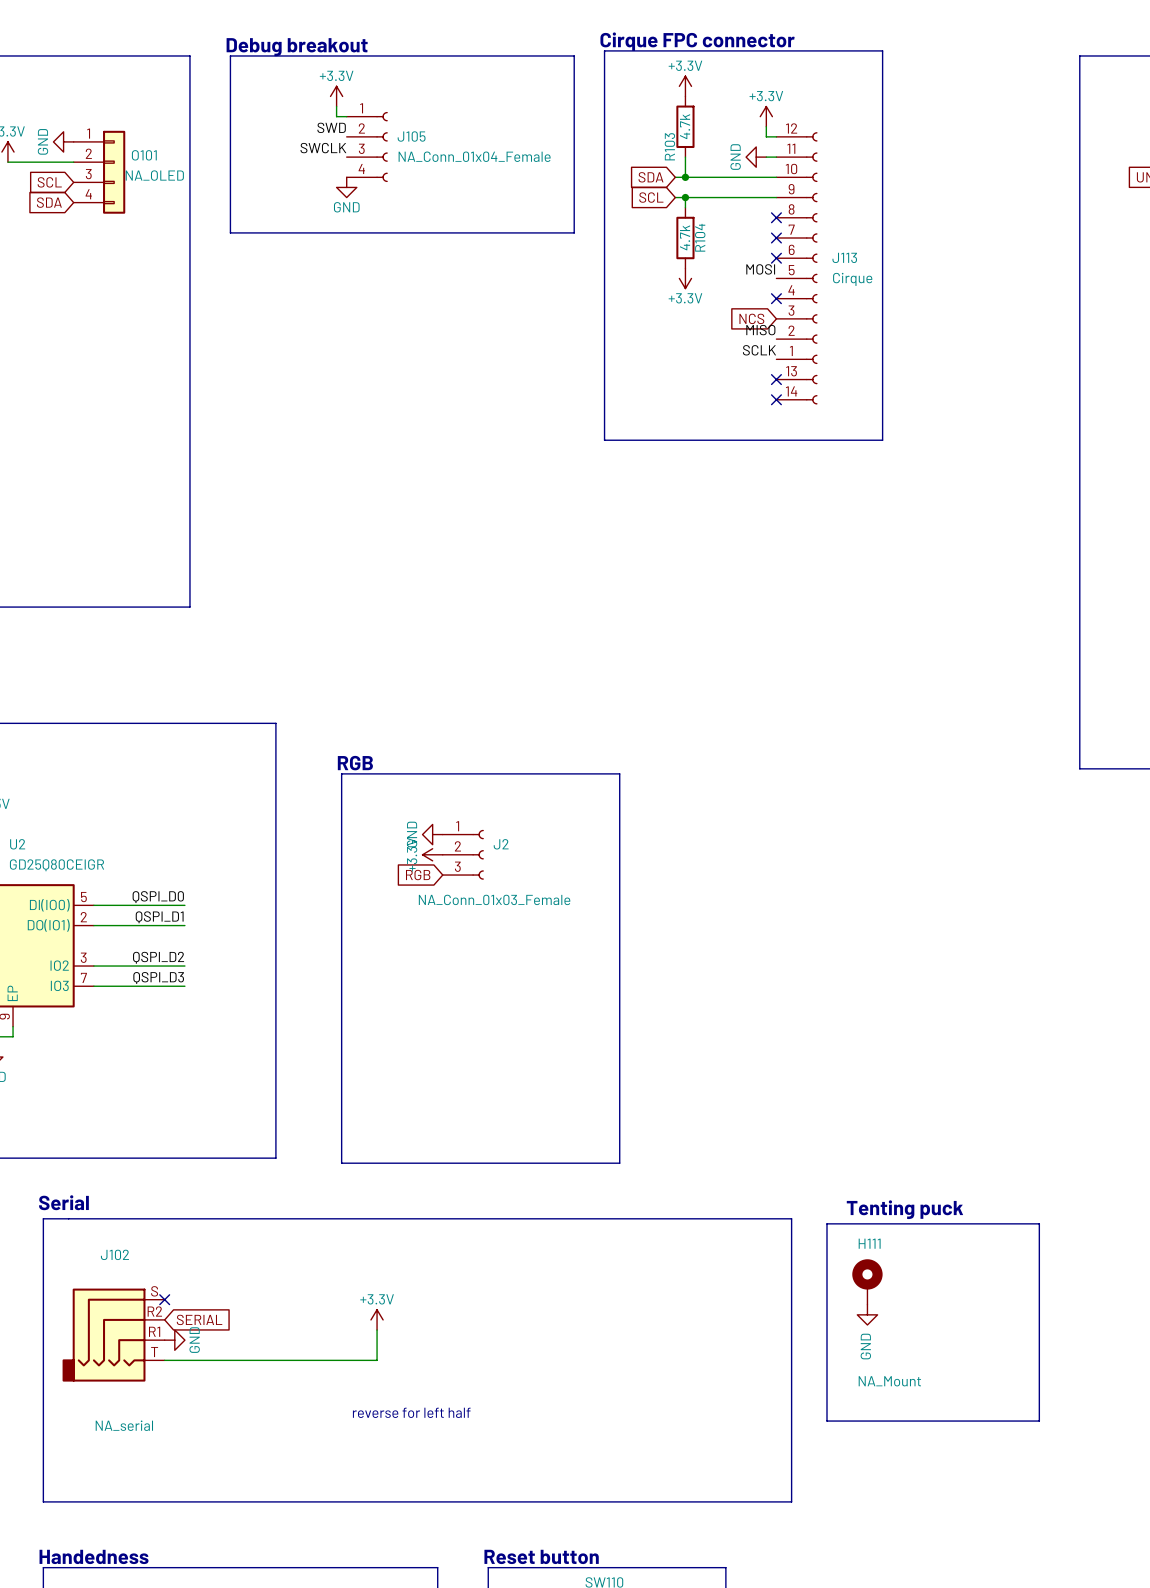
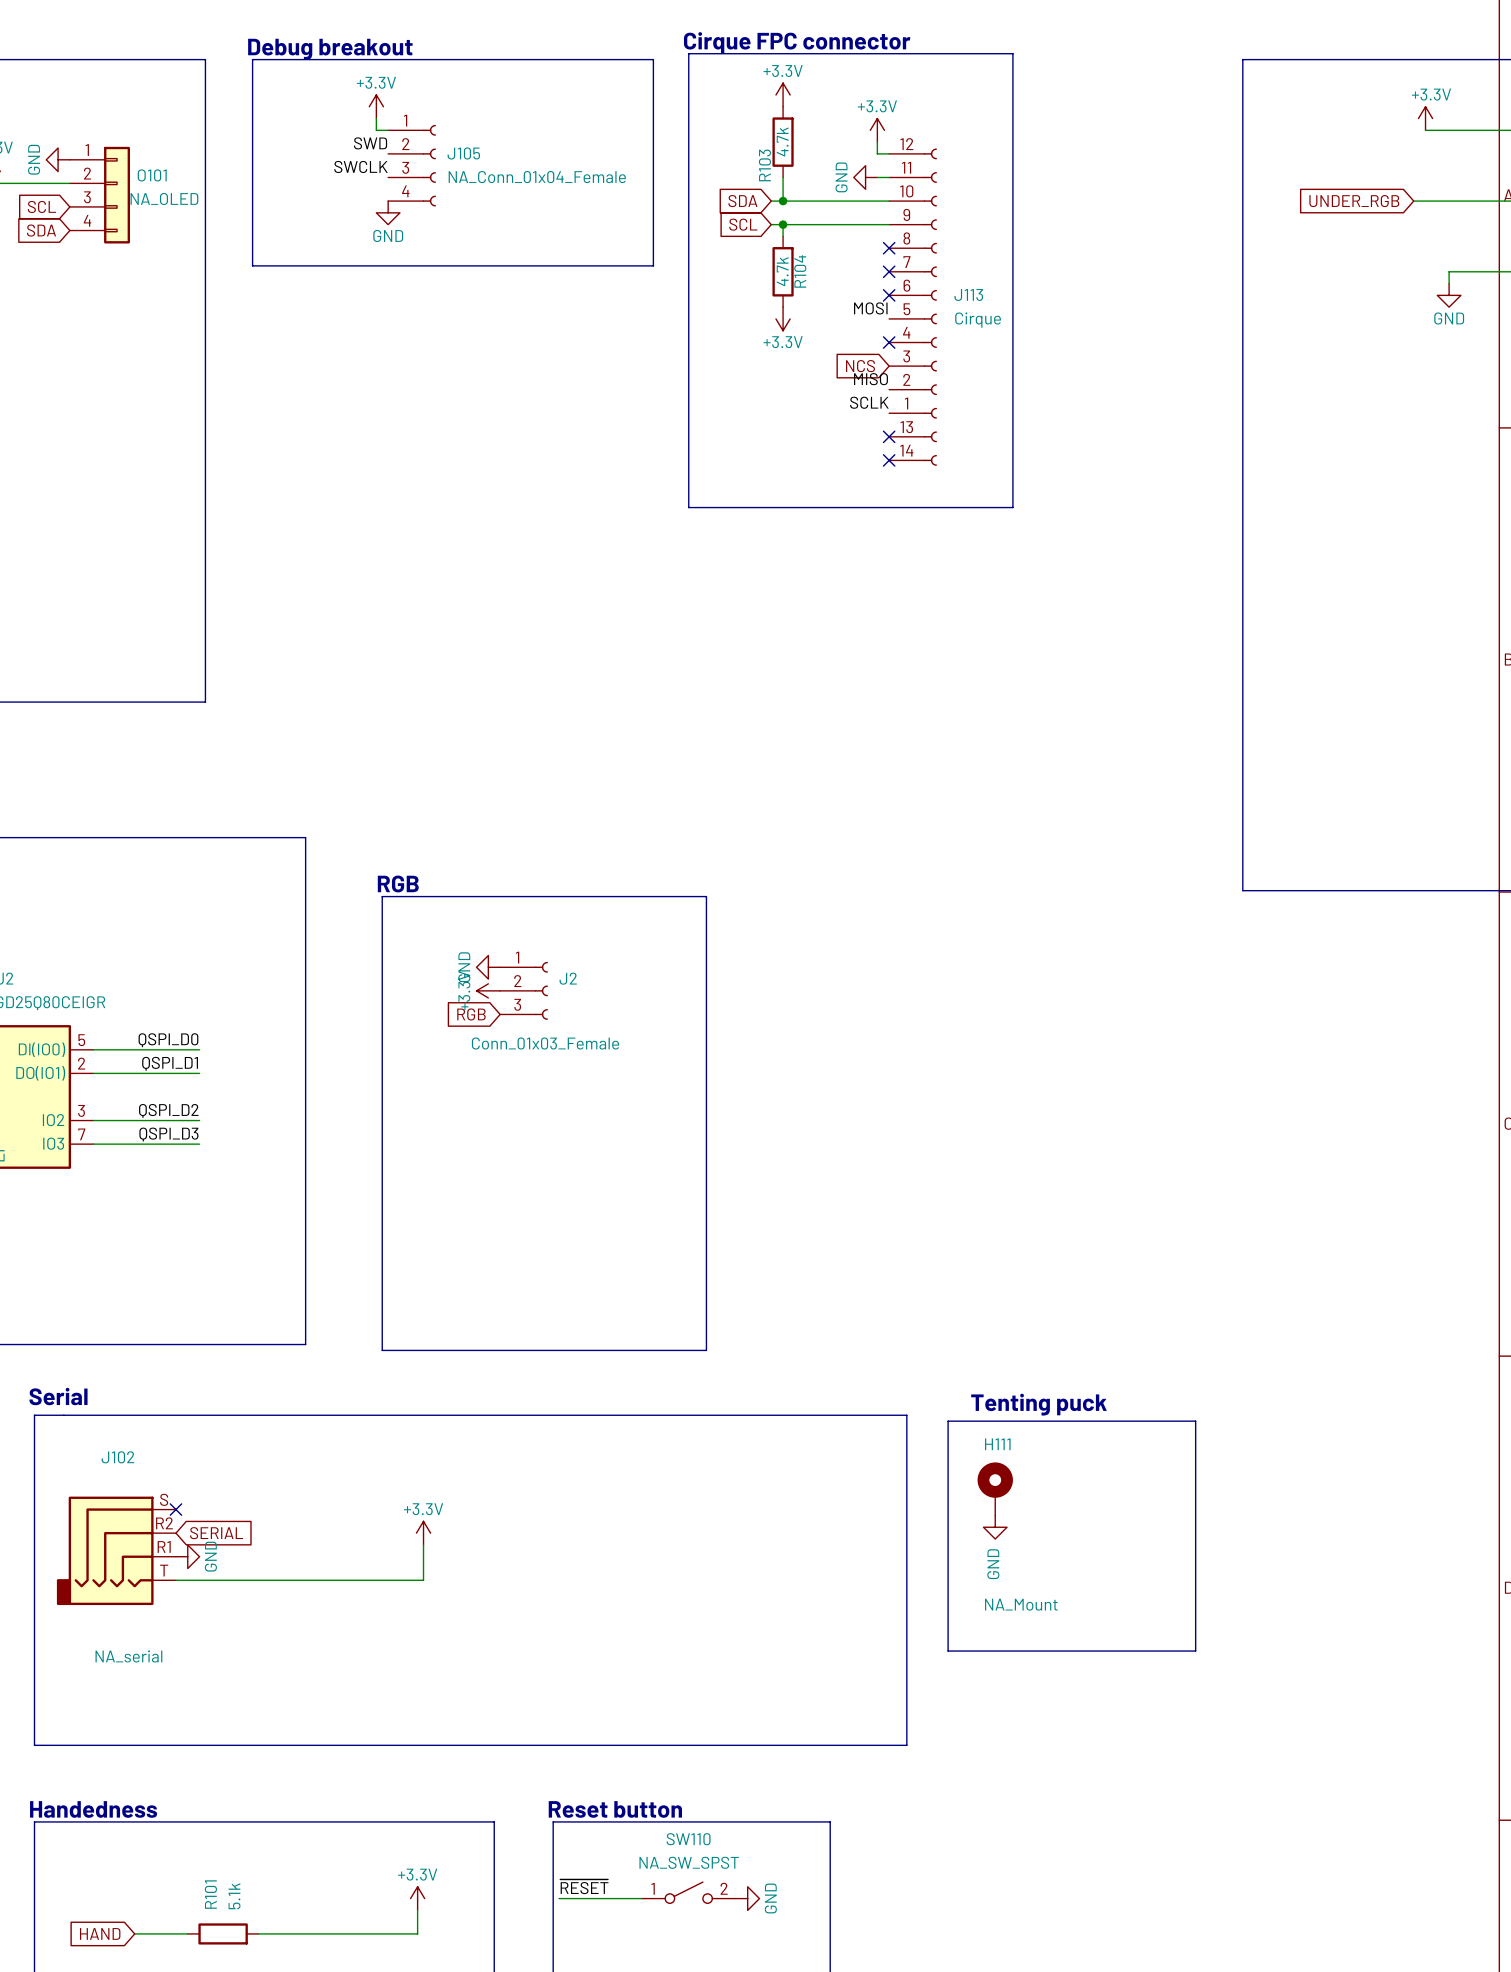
J2 value: NA_Conn_01x03_Female (494, 899) -> Conn_01x03_Female (545, 1043)
text: reverse for left half (411, 1412) -> none

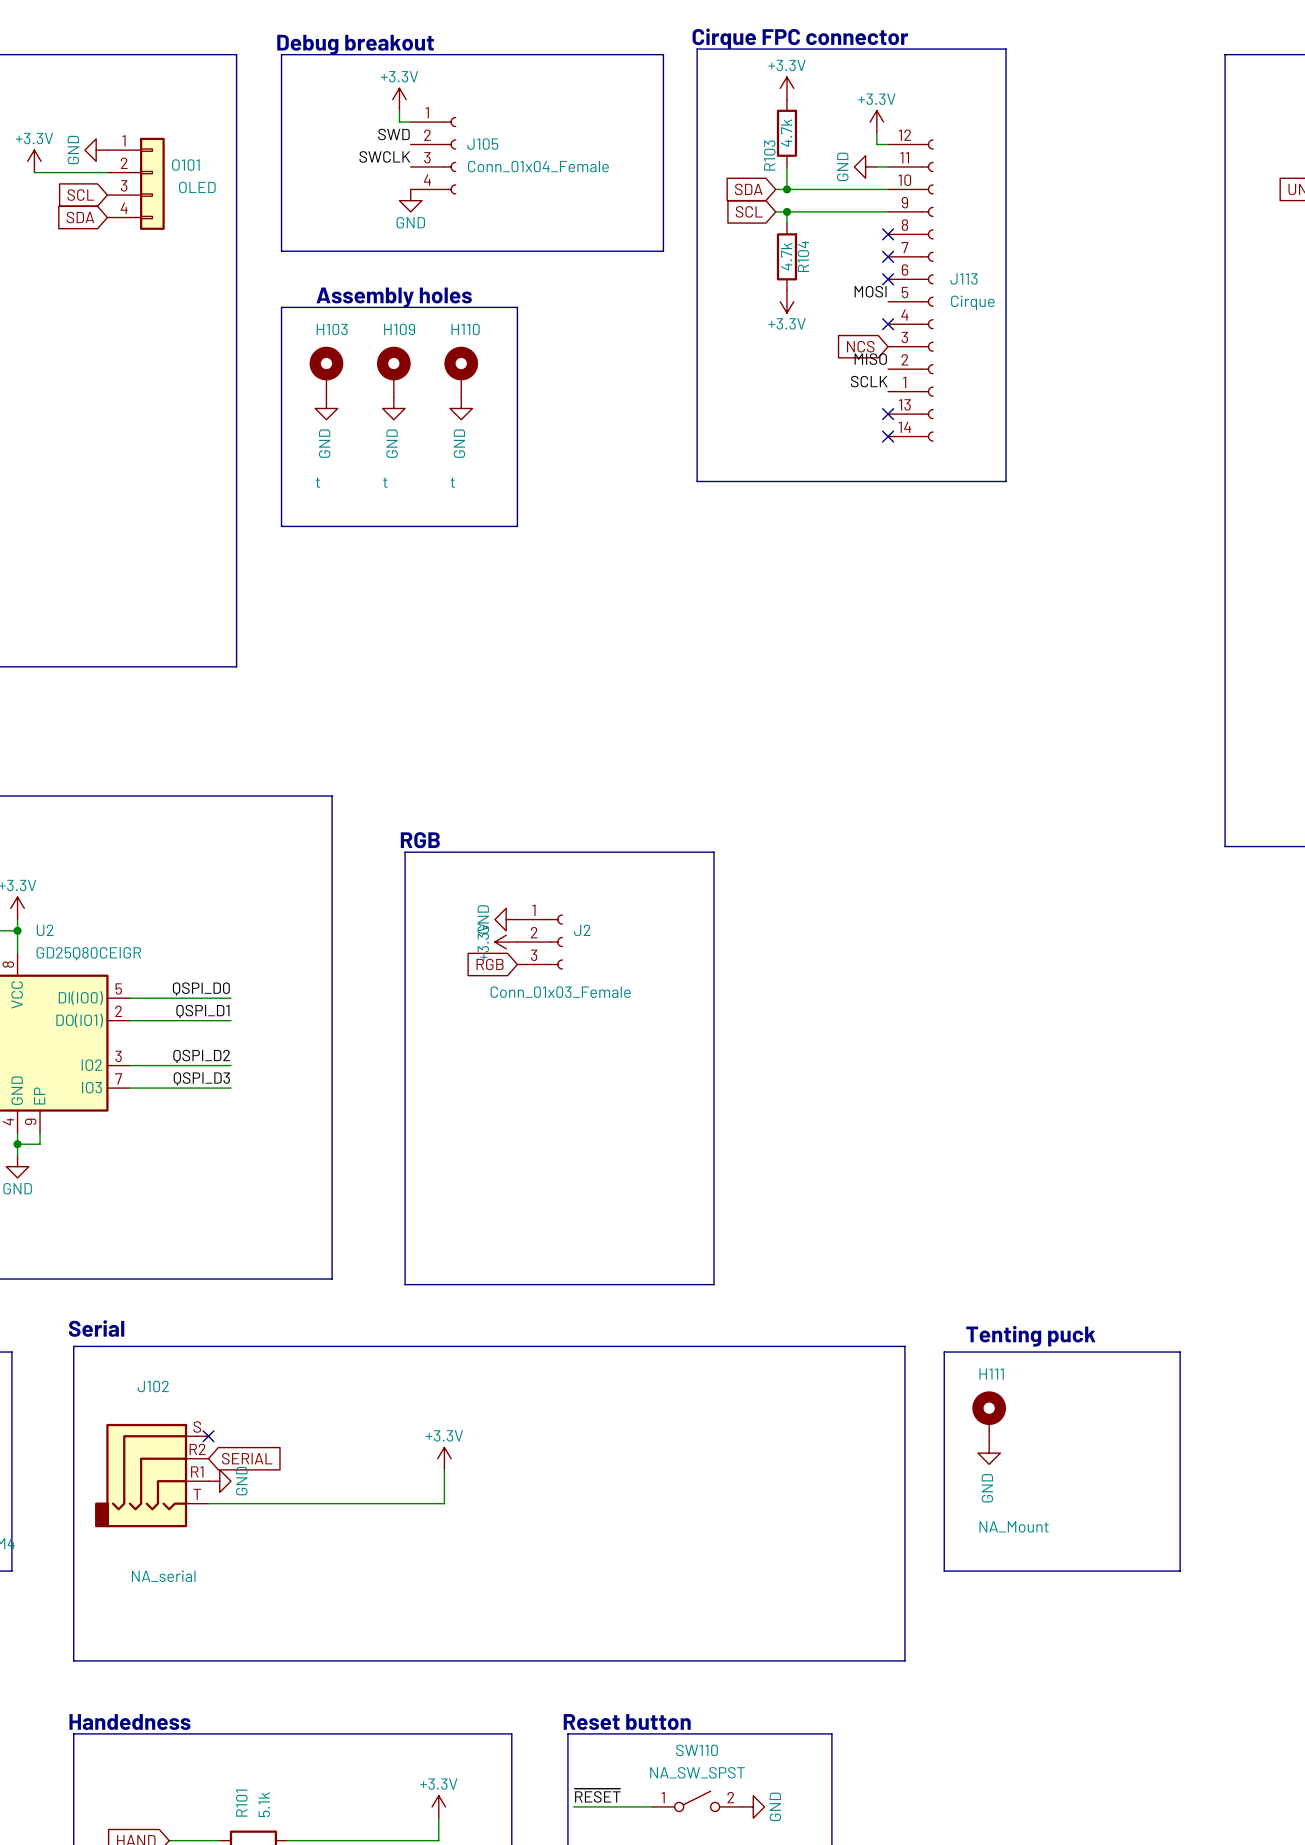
J105 value: NA_Conn_01x04_Female (537, 177) -> Conn_01x04_Female (538, 166)
O101 value: NA_OLED (164, 198) -> OLED (197, 187)
text: none -> Assembly holes (394, 297)
line: none -> (281, 307) (281, 526) (517, 526) (517, 307) (281, 307)
H103: none -> t (326, 371)
H109: none -> t (393, 371)
H110: none -> t (461, 371)
power symbol: none -> GND (326, 408)
power symbol: none -> GND (393, 408)
power symbol: none -> GND (461, 408)

